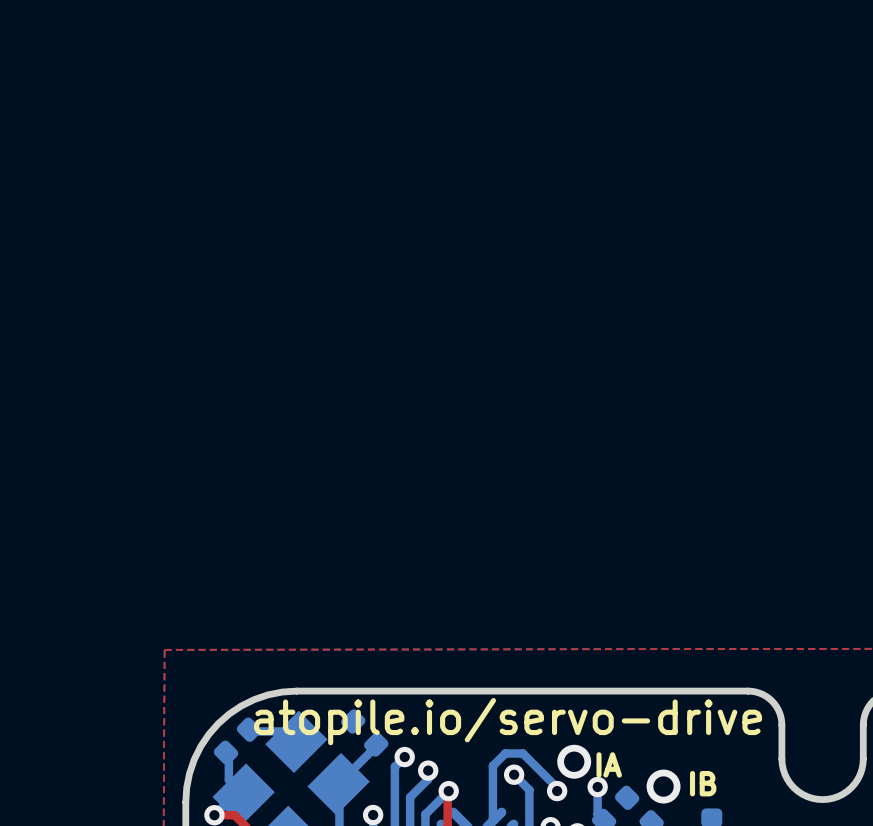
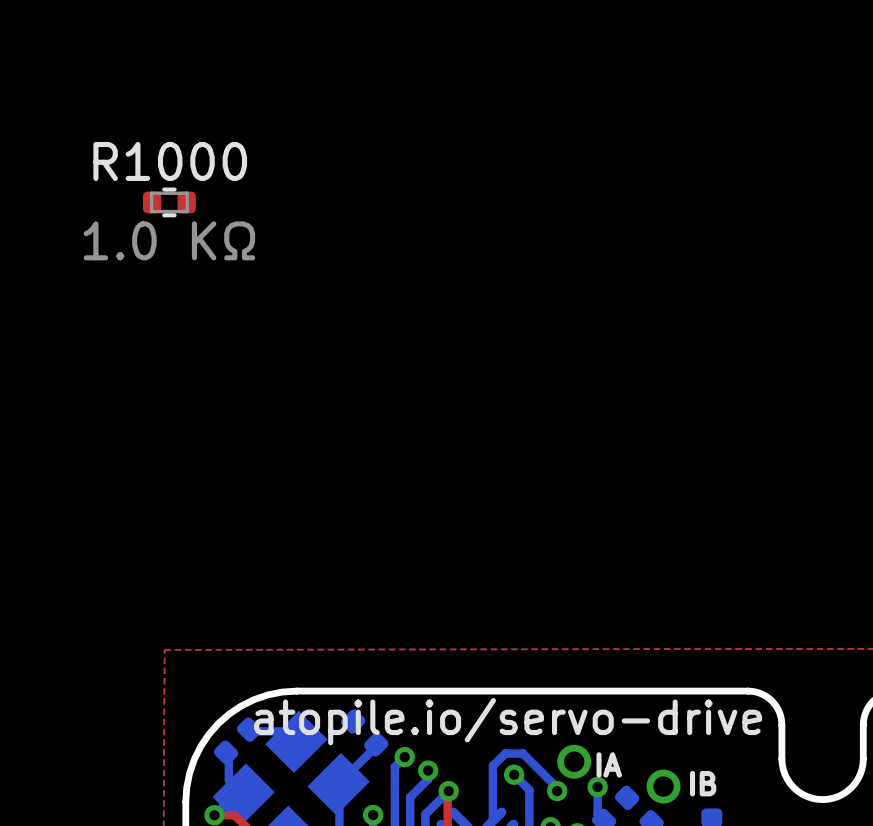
R1000: none -> 1.0 KΩ (169, 202)

